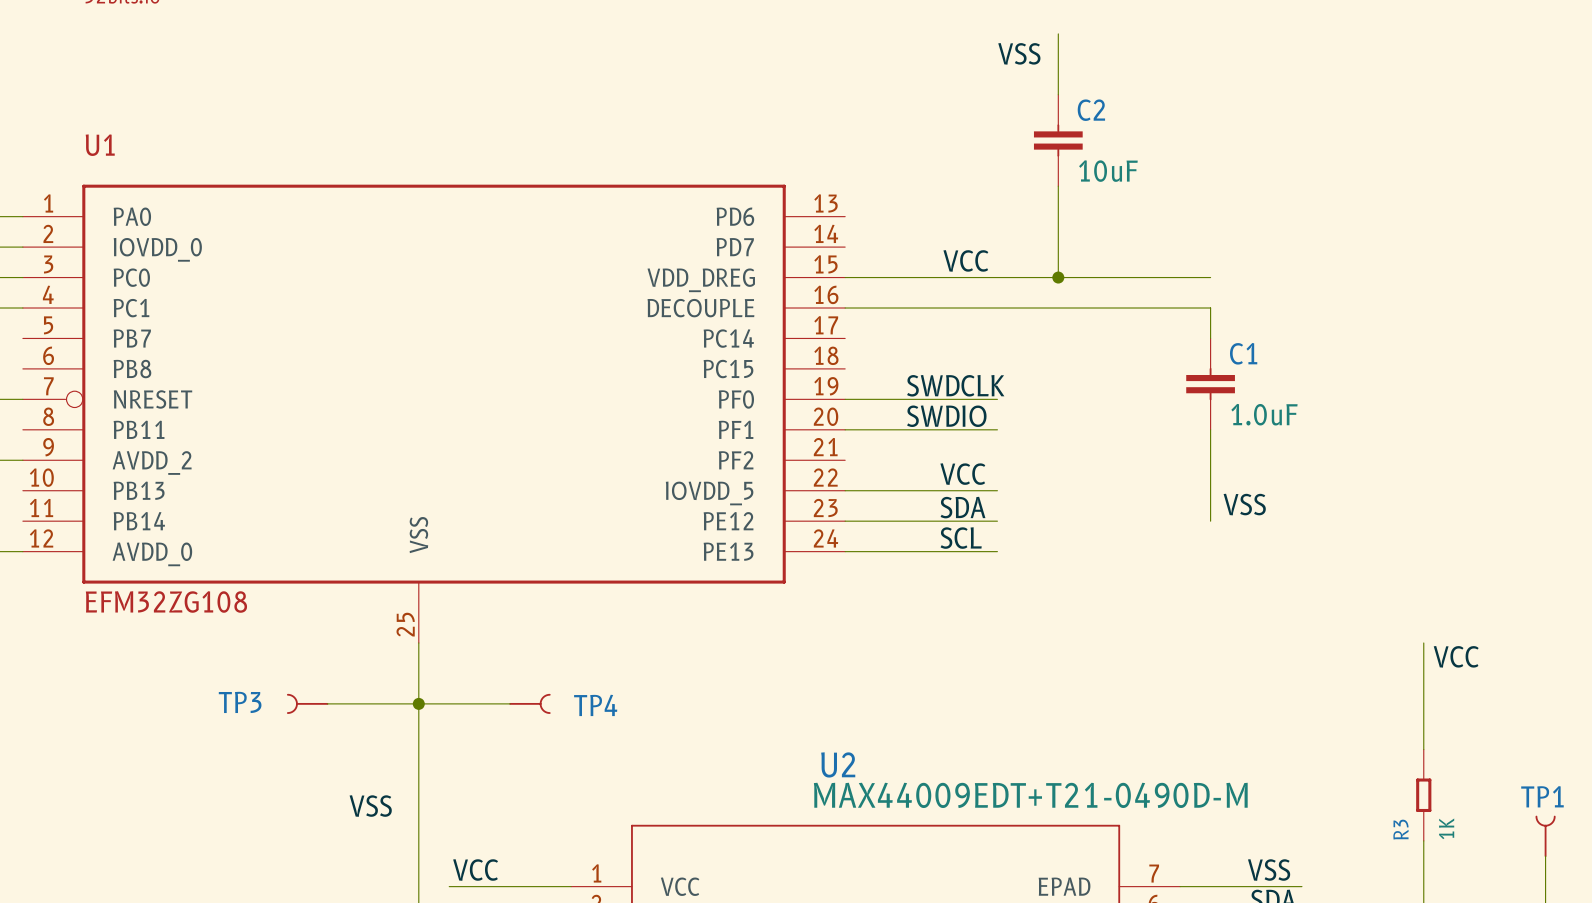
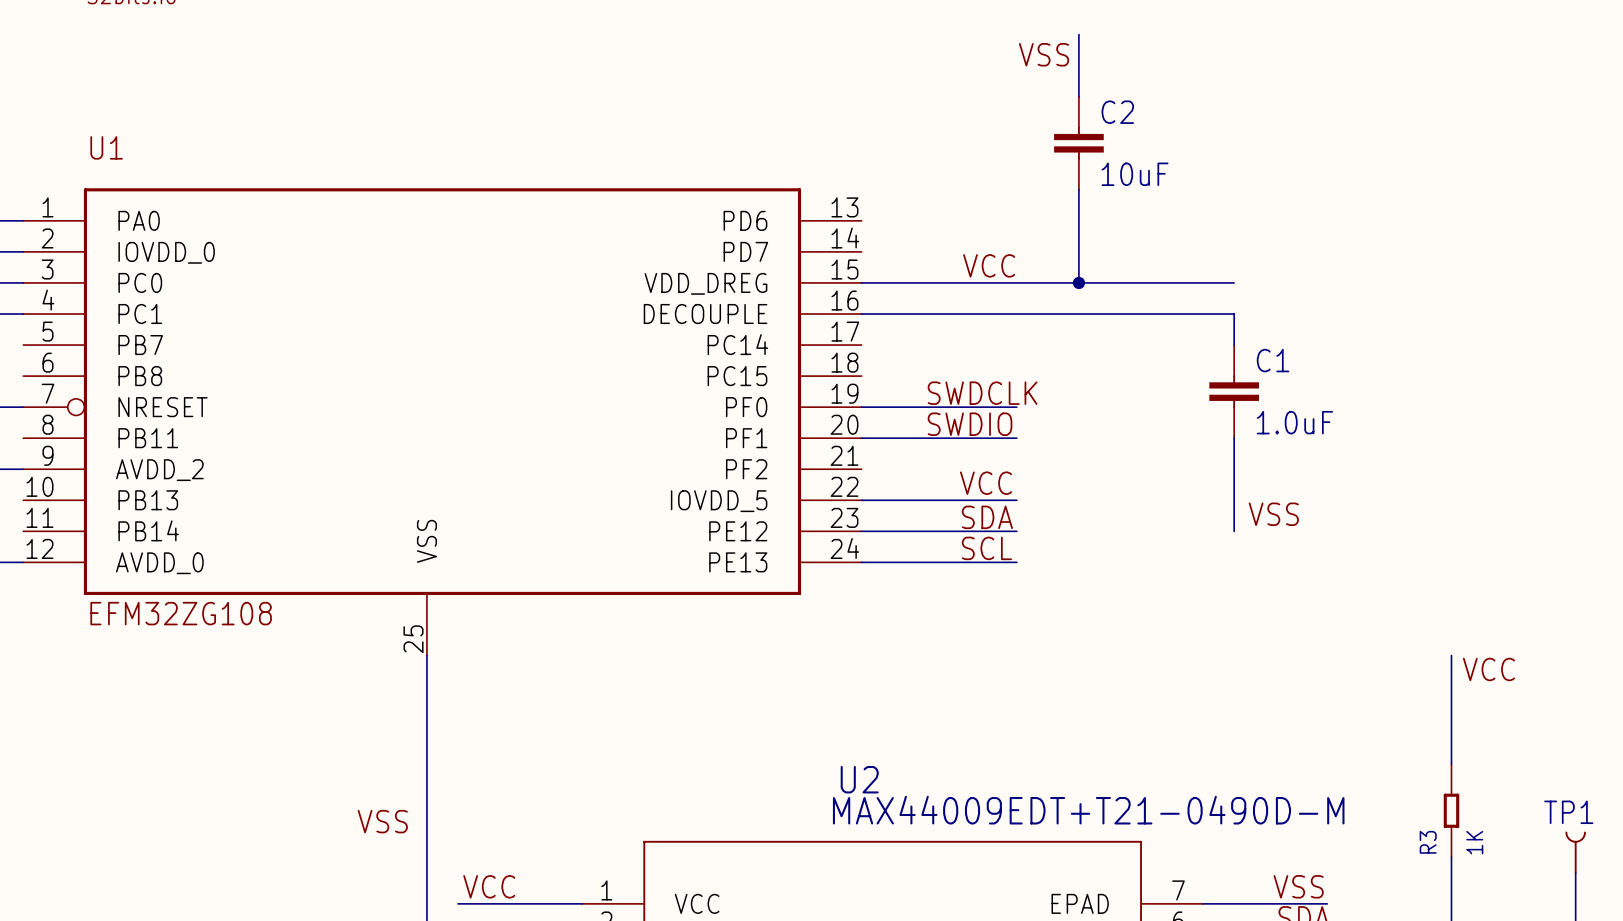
TP3: (307, 703) -> none
wire: (327, 703) (510, 703) -> none
junction: (418, 703) -> none
TP4: (529, 703) -> none

